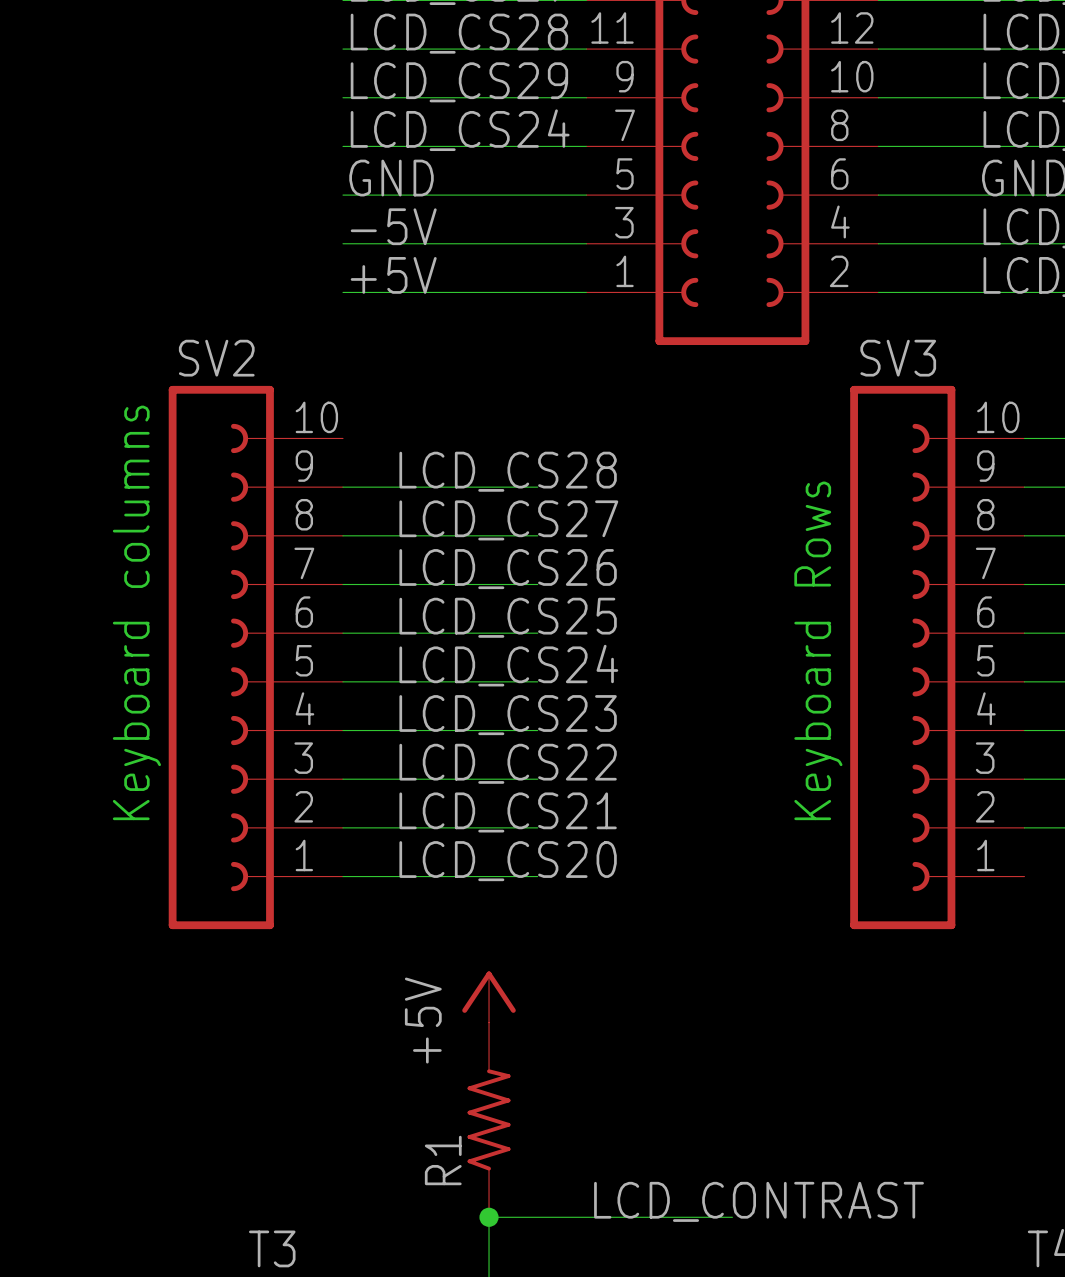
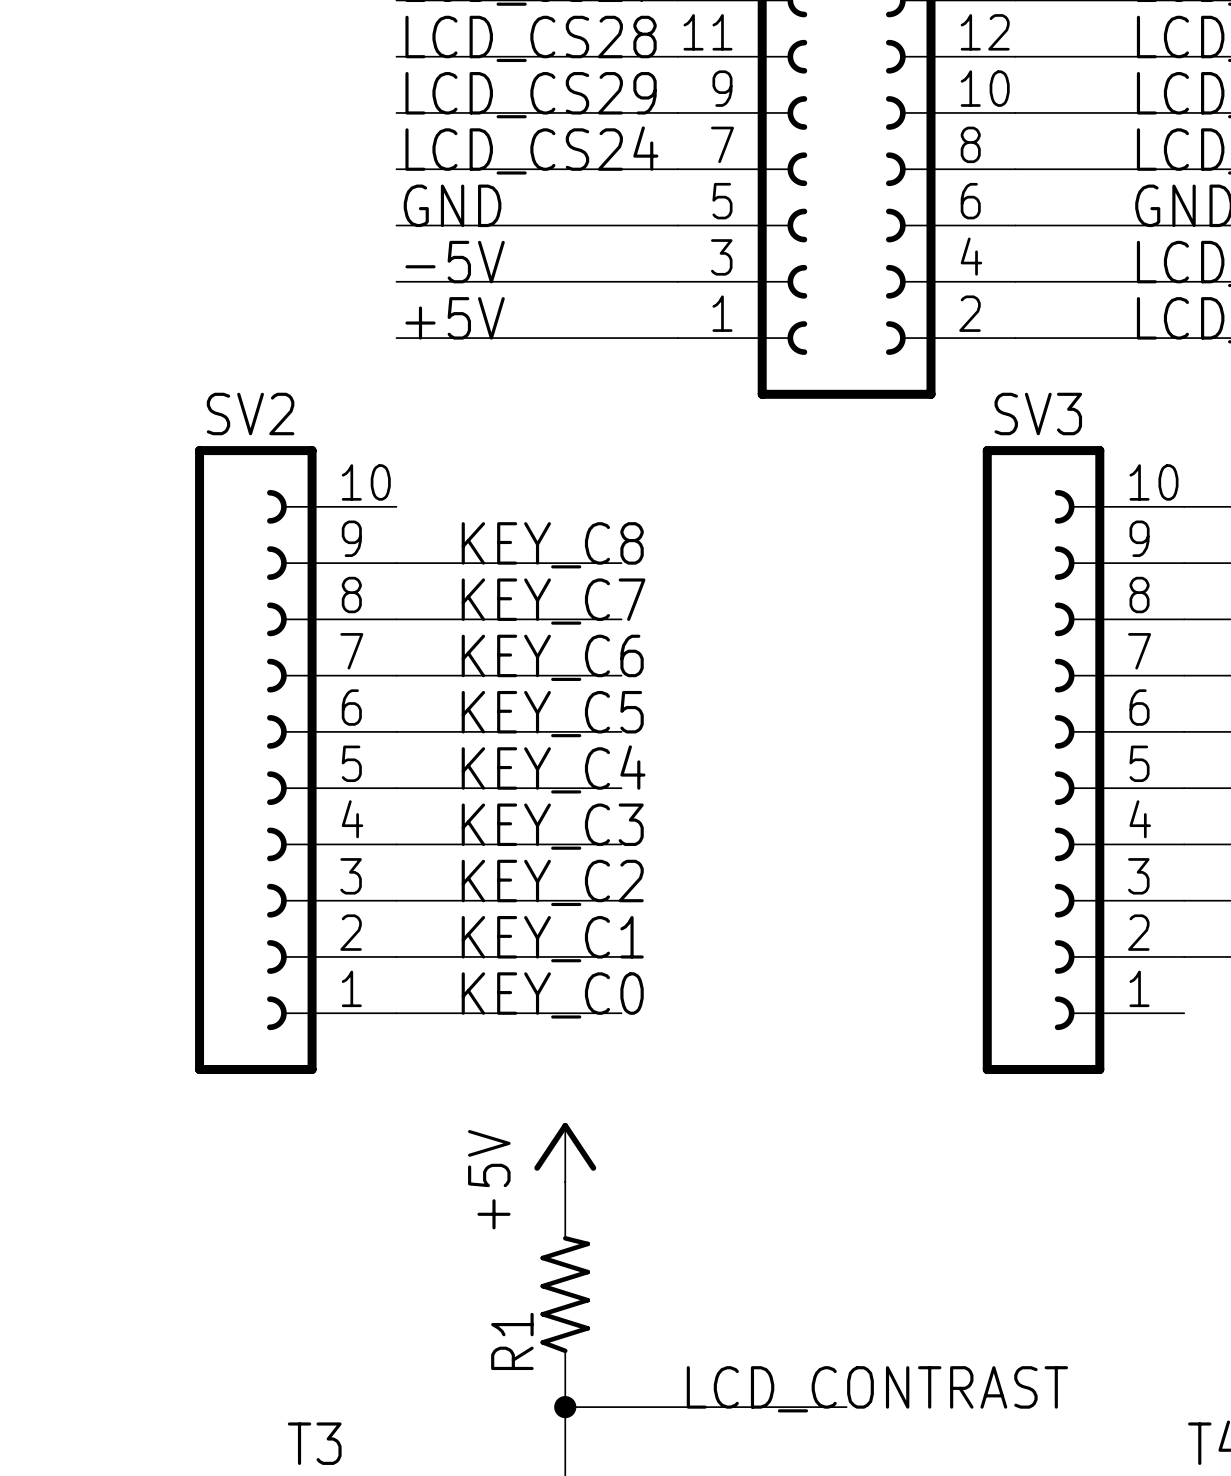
label: LCD_CS28 (508, 471) -> KEY_C8 (552, 545)
label: LCD_CS27 (508, 520) -> KEY_C7 (553, 601)
label: LCD_CS26 (508, 569) -> KEY_C6 (552, 657)
text: Keyboard columns (136, 612) -> none
label: LCD_CS25 (508, 617) -> KEY_C5 (552, 714)
text: Keyboard Rows (818, 650) -> none
label: LCD_CS24 (508, 665) -> KEY_C4 (553, 769)
label: LCD_CS23 (508, 715) -> KEY_C3 (552, 826)
label: LCD_CS22 (508, 763) -> KEY_C2 (552, 882)
label: LCD_CS21 (508, 812) -> KEY_C1 (552, 939)
label: LCD_CS20 (508, 861) -> KEY_C0 (552, 995)

